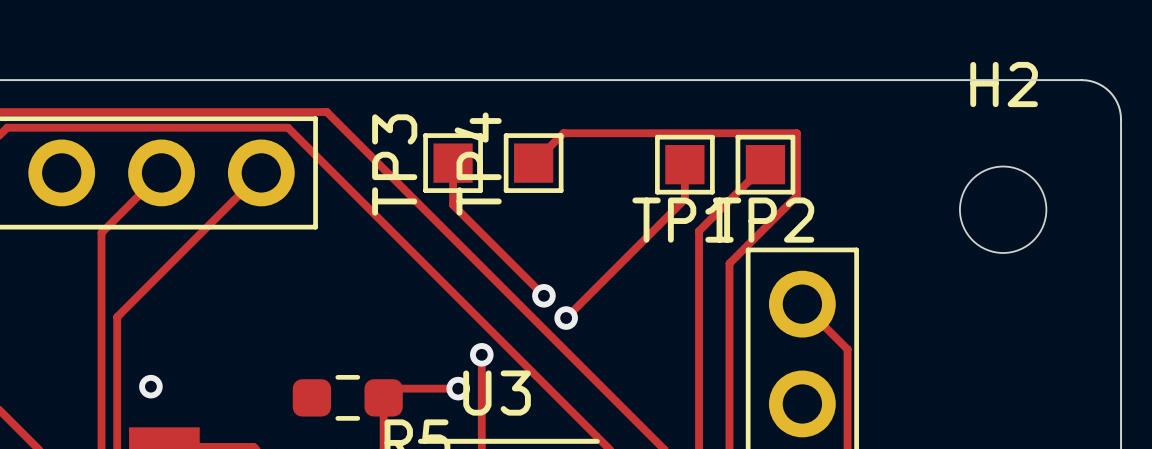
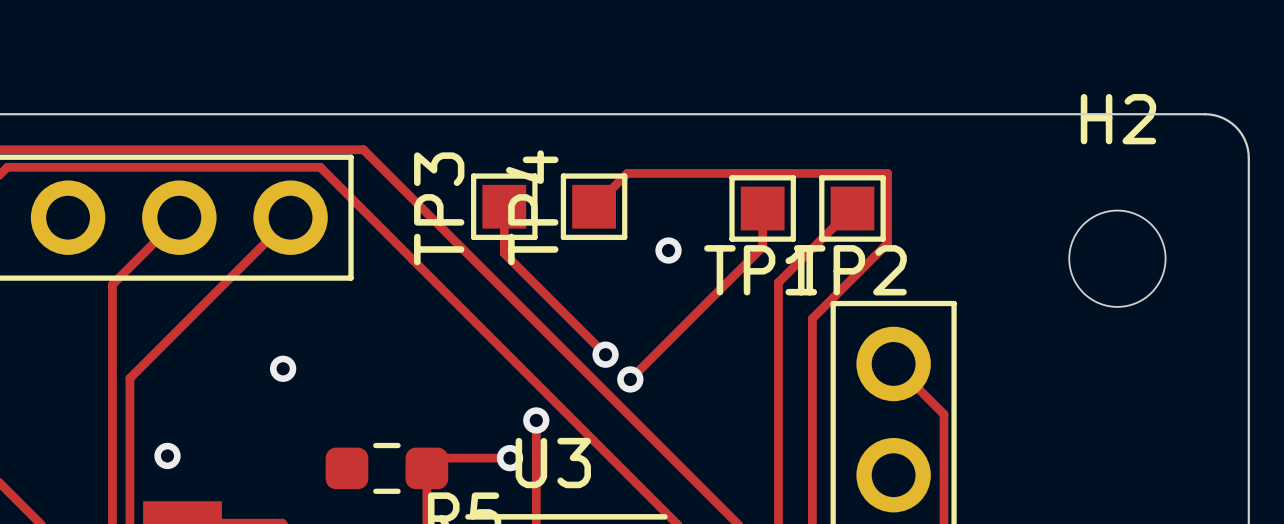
via: none -> (668, 250)
via: none -> (283, 368)

